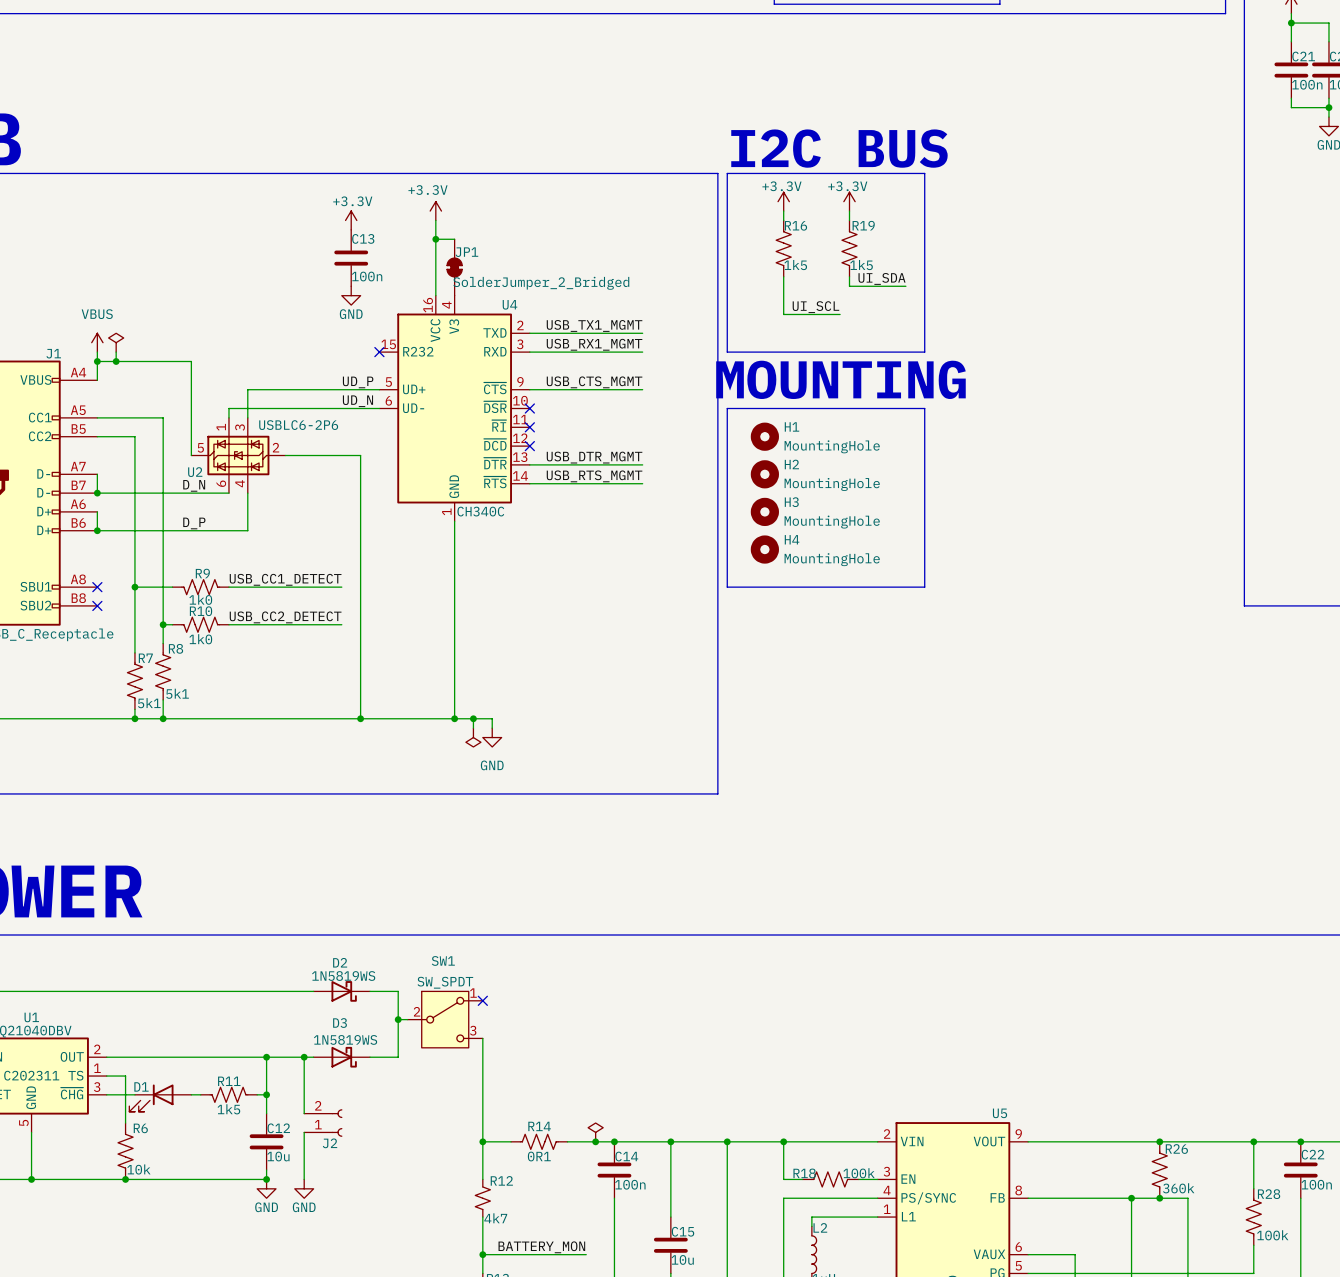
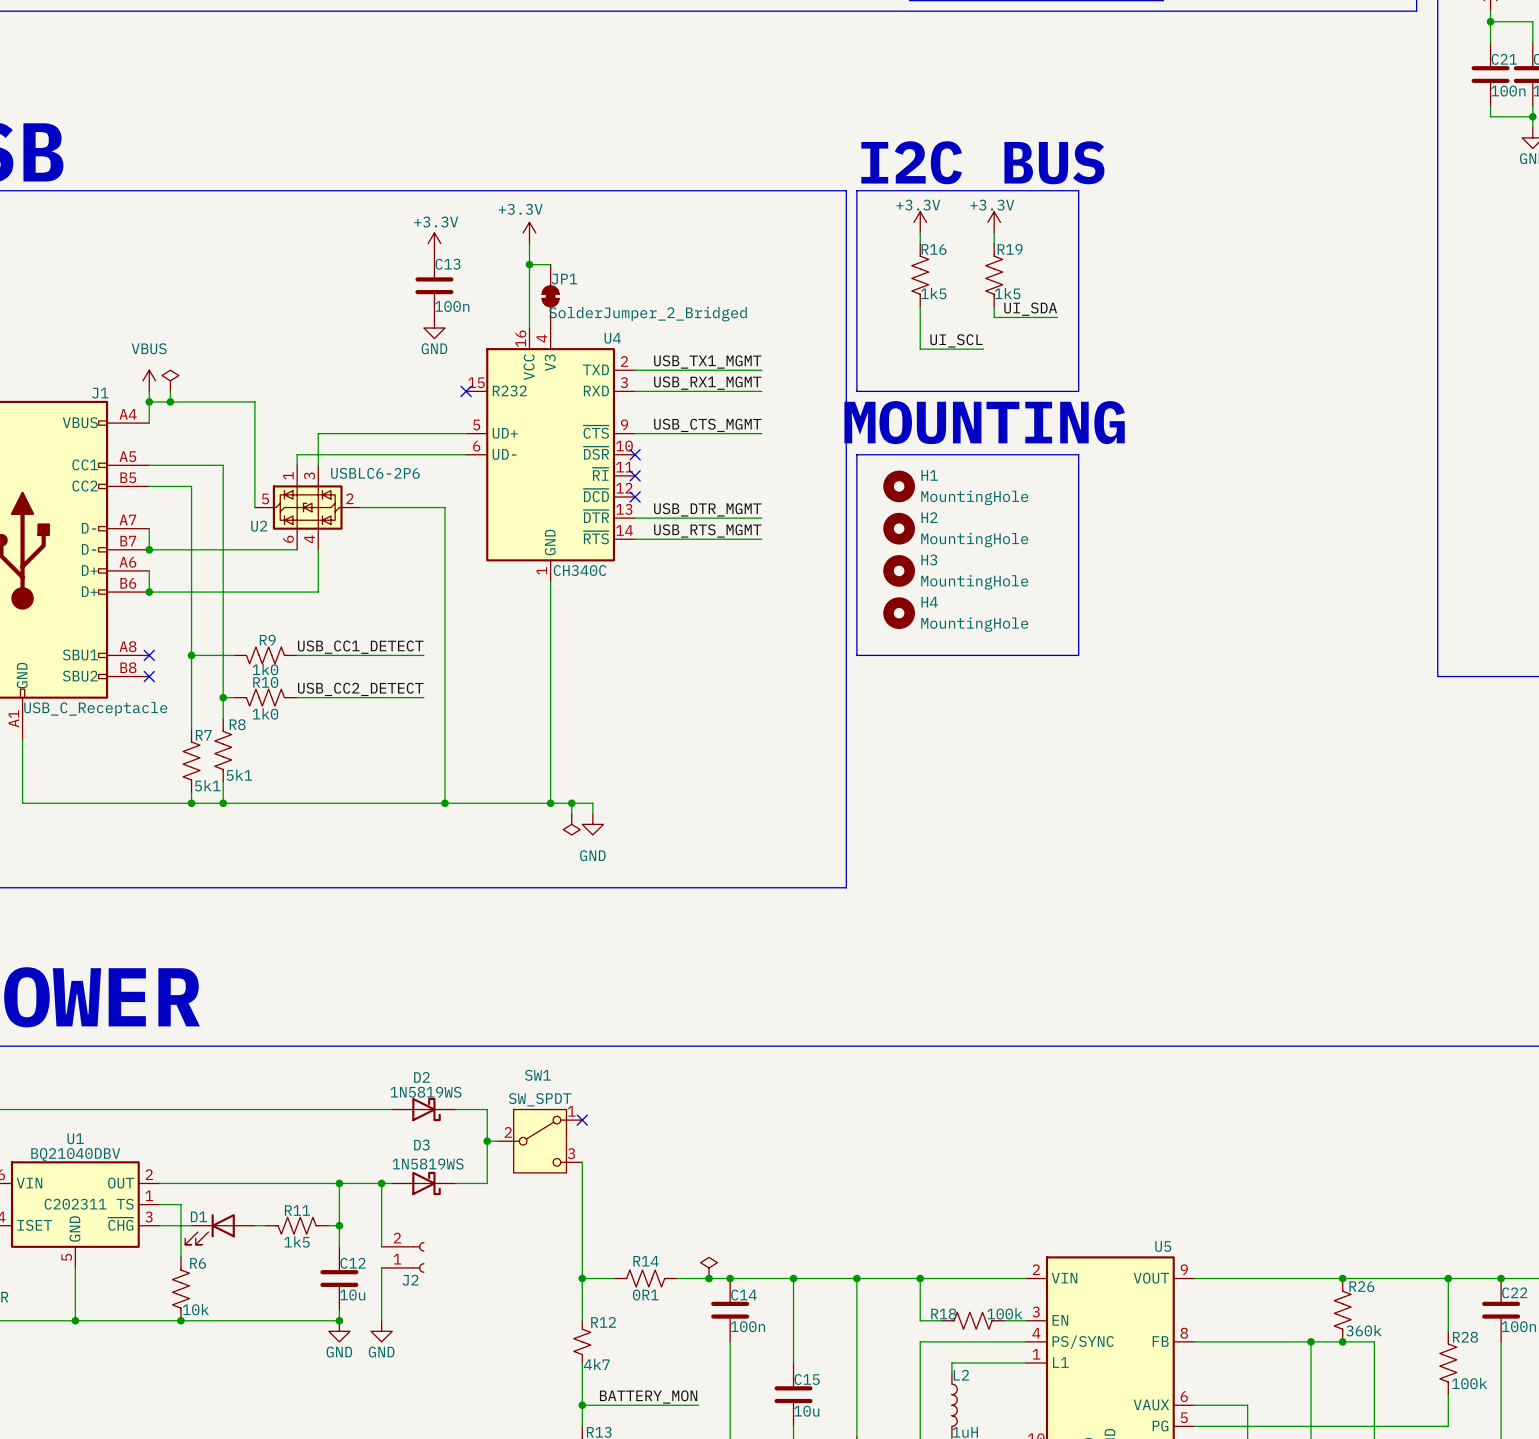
label: UD_P (358, 382) -> none
label: UD_N (357, 401) -> none
label: D_N (194, 485) -> none
label: D_P (194, 523) -> none

